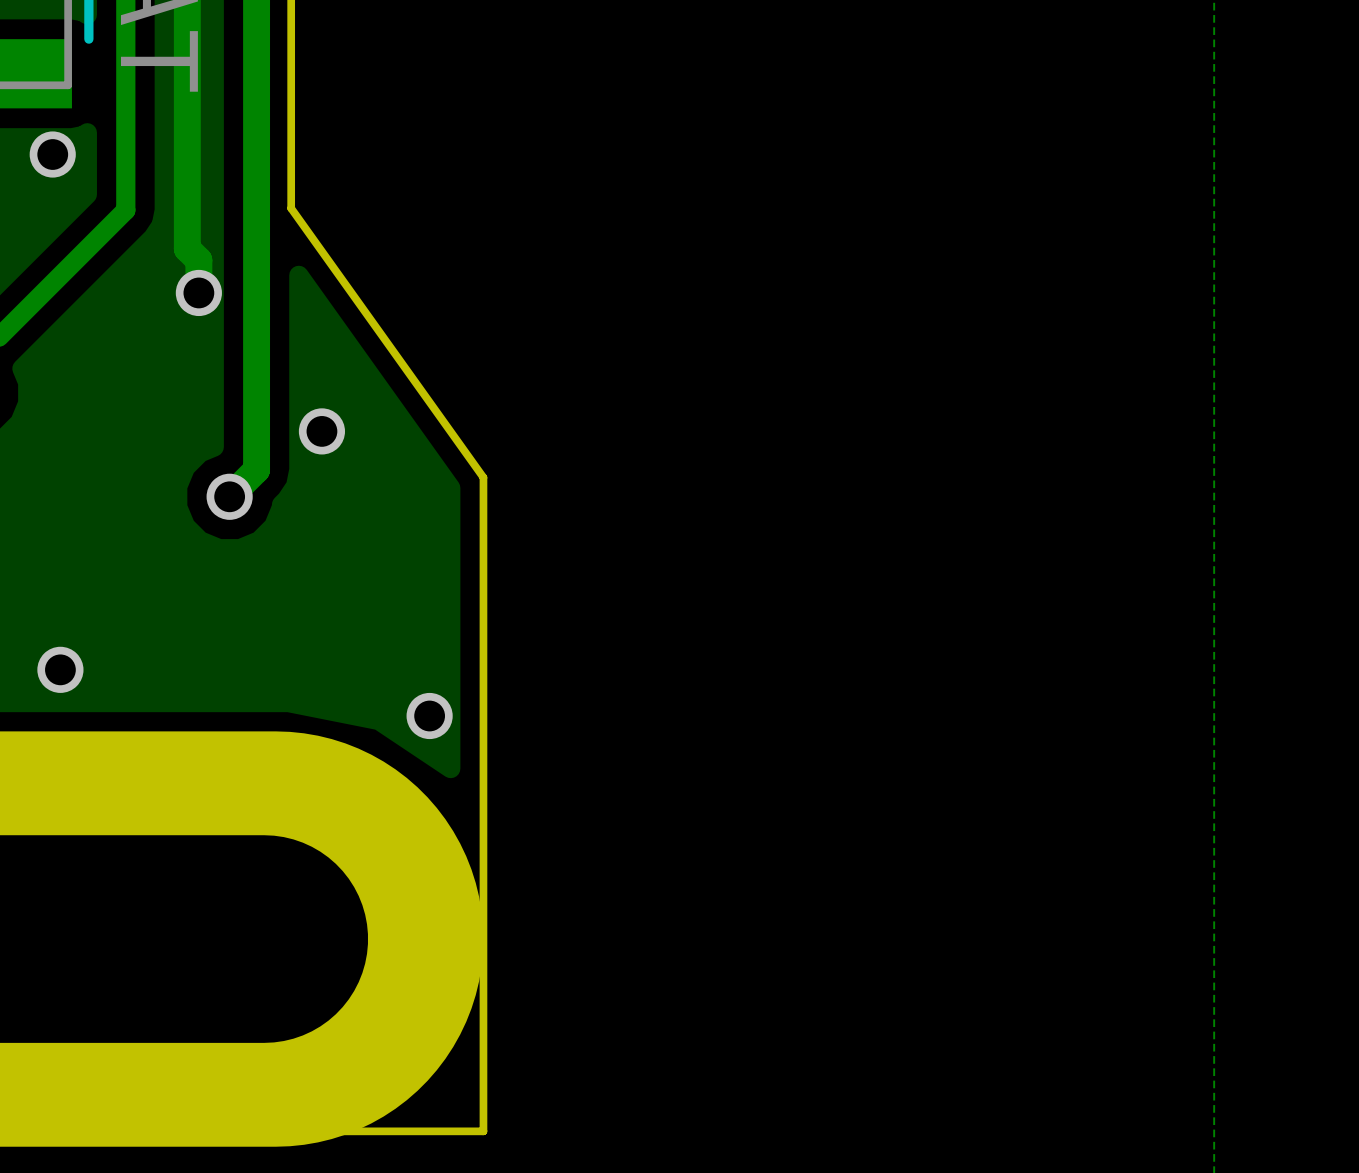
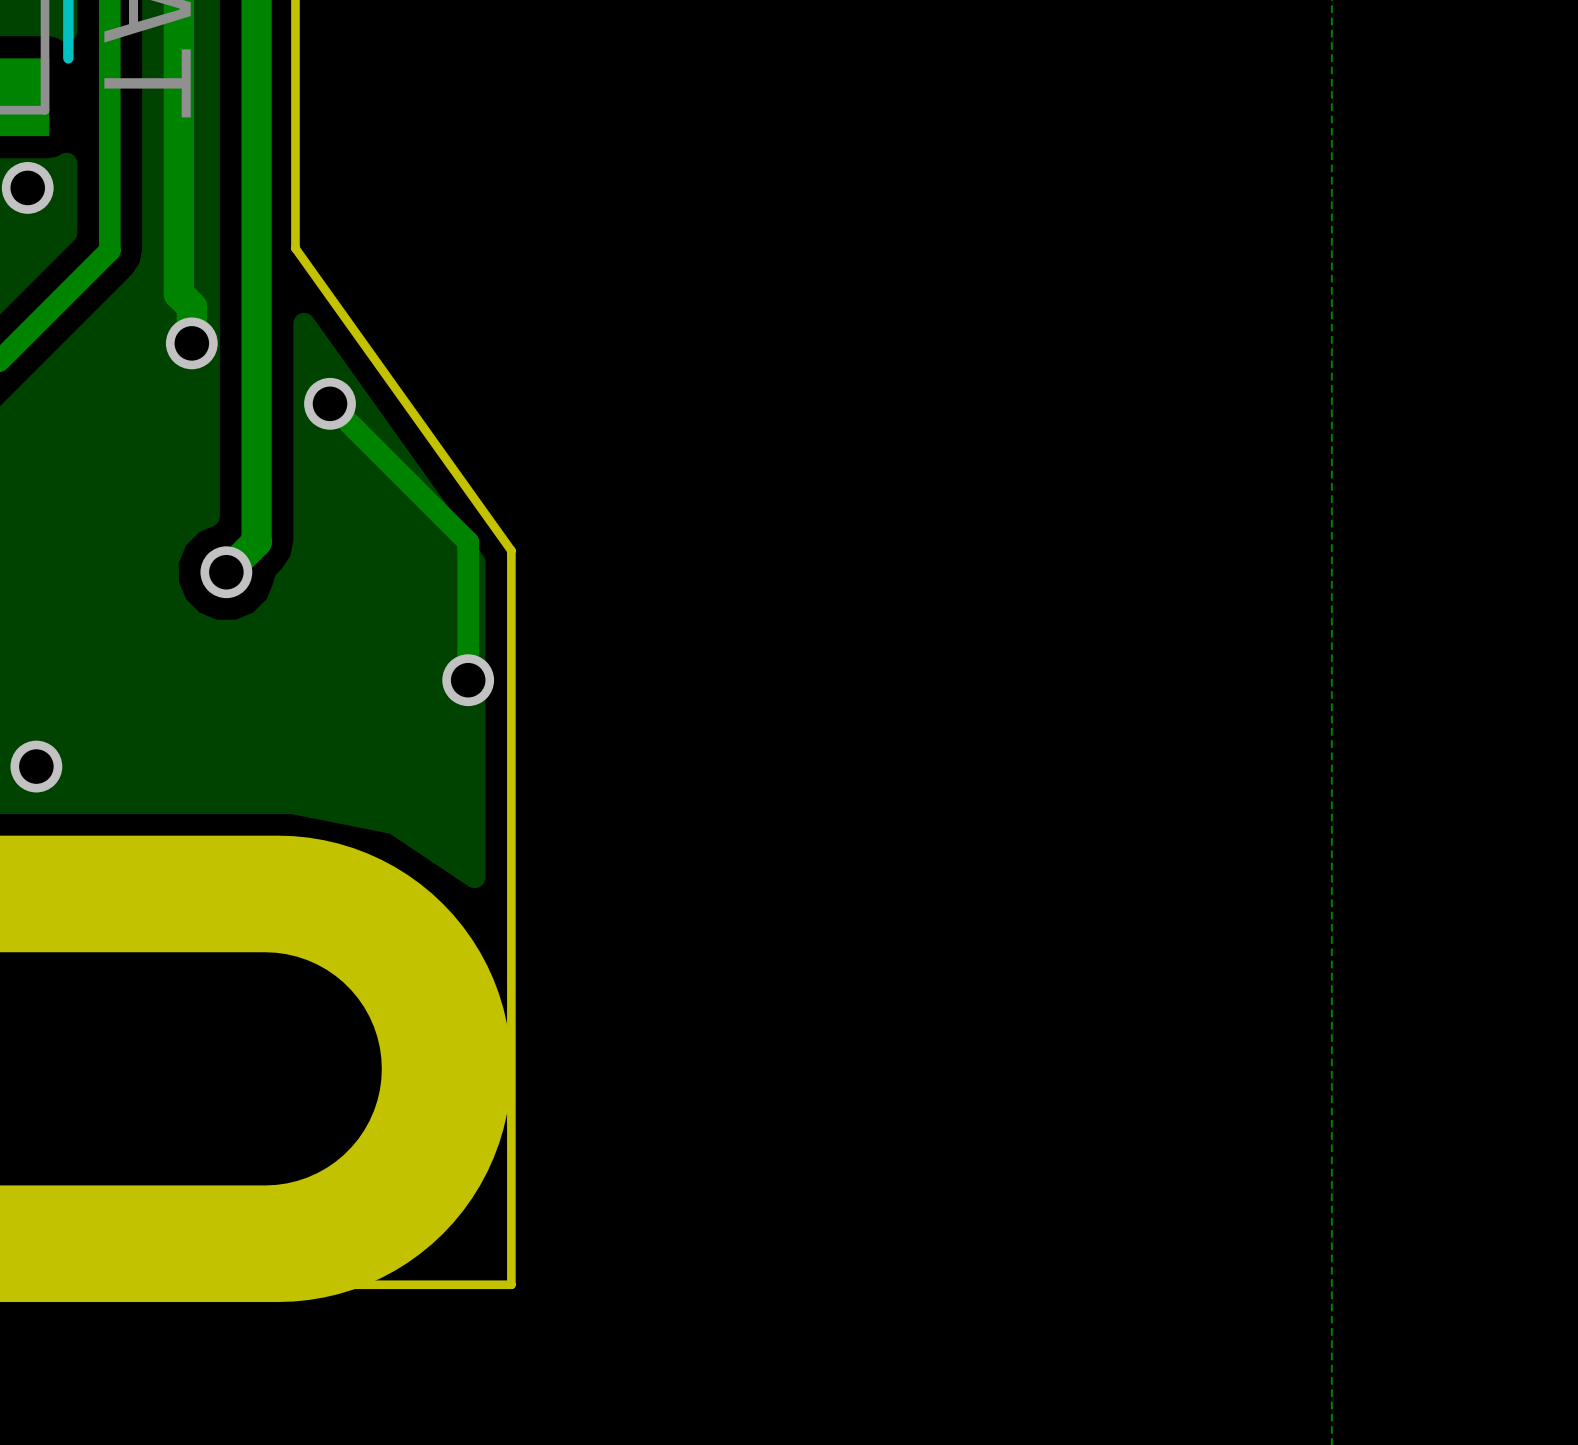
track: none -> (330, 403) (468, 542) (468, 680)
via position: (321, 431) -> (330, 403)
via: none -> (468, 680)
via: (429, 716) -> none

